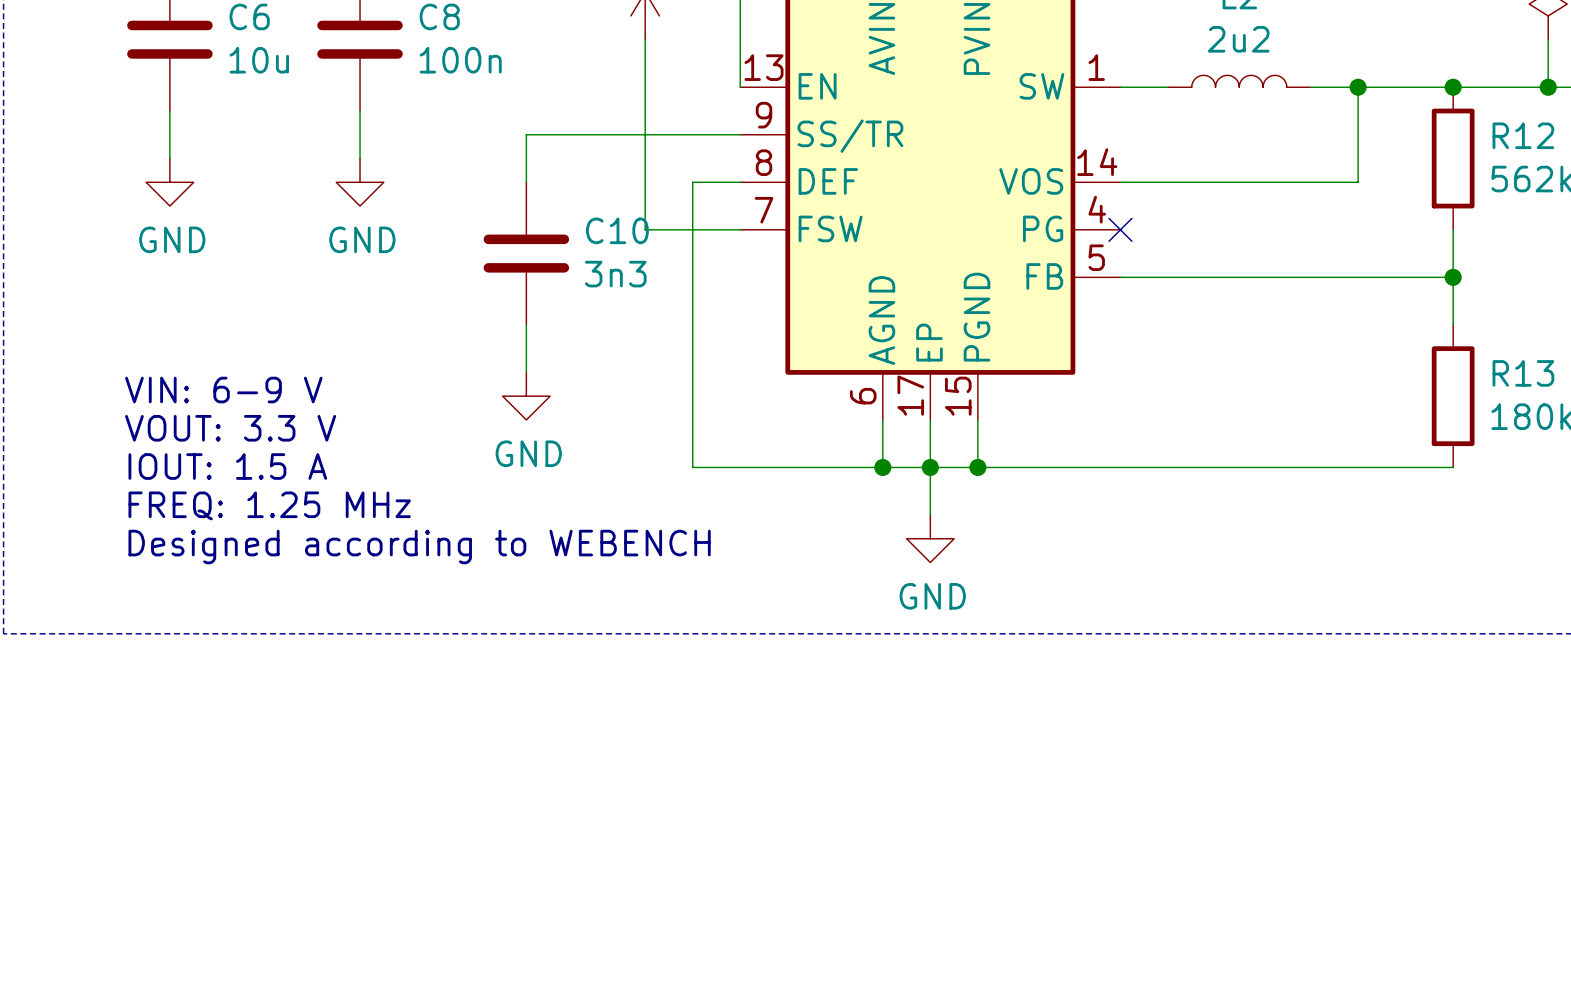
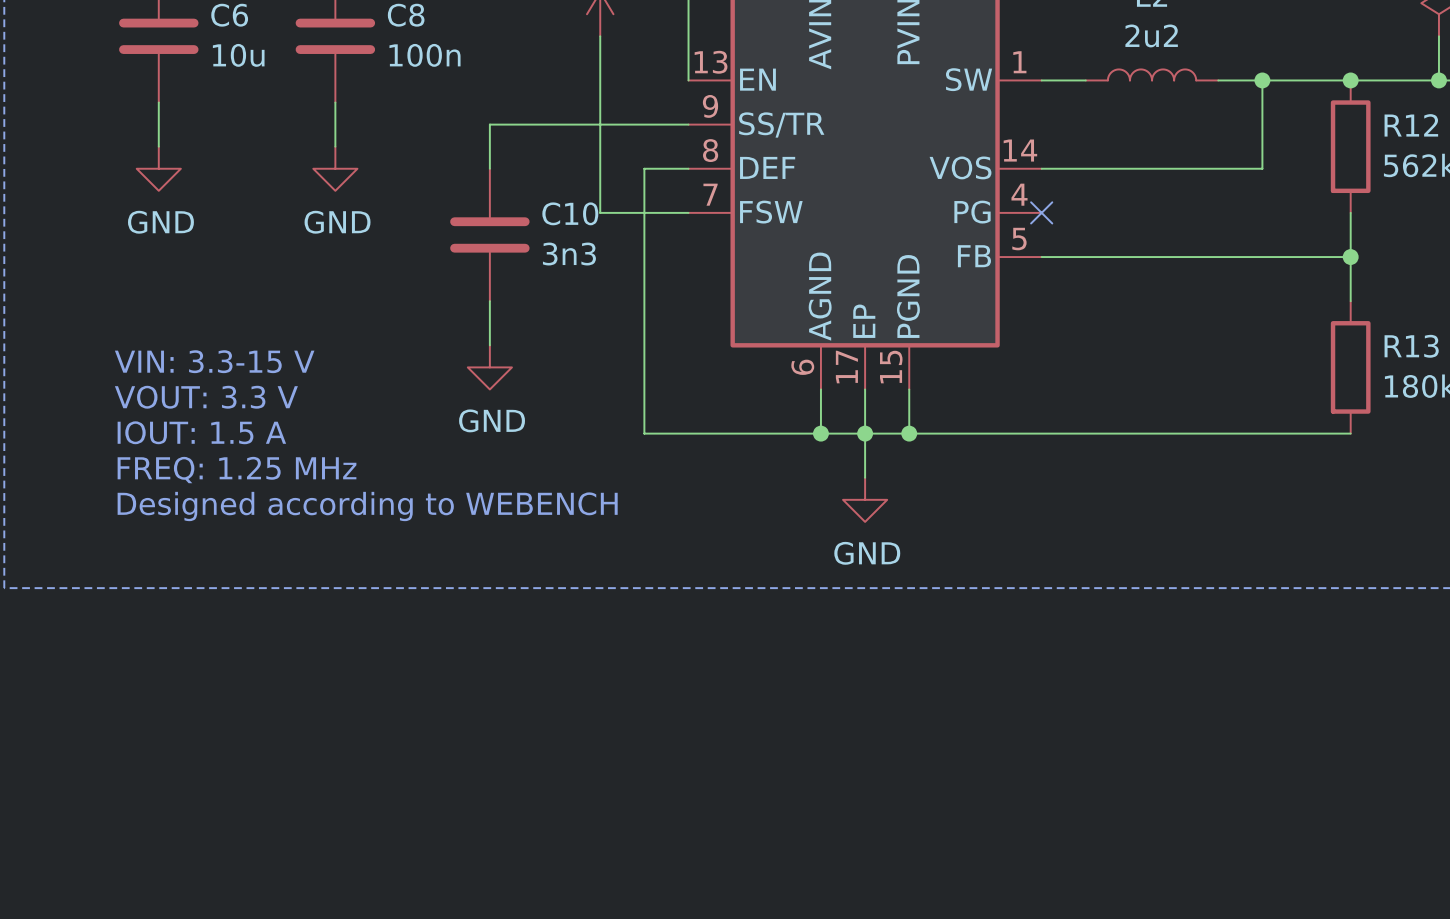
text: VIN: 6-9 V (223, 390) -> VIN: 3.3-15 V (214, 361)

